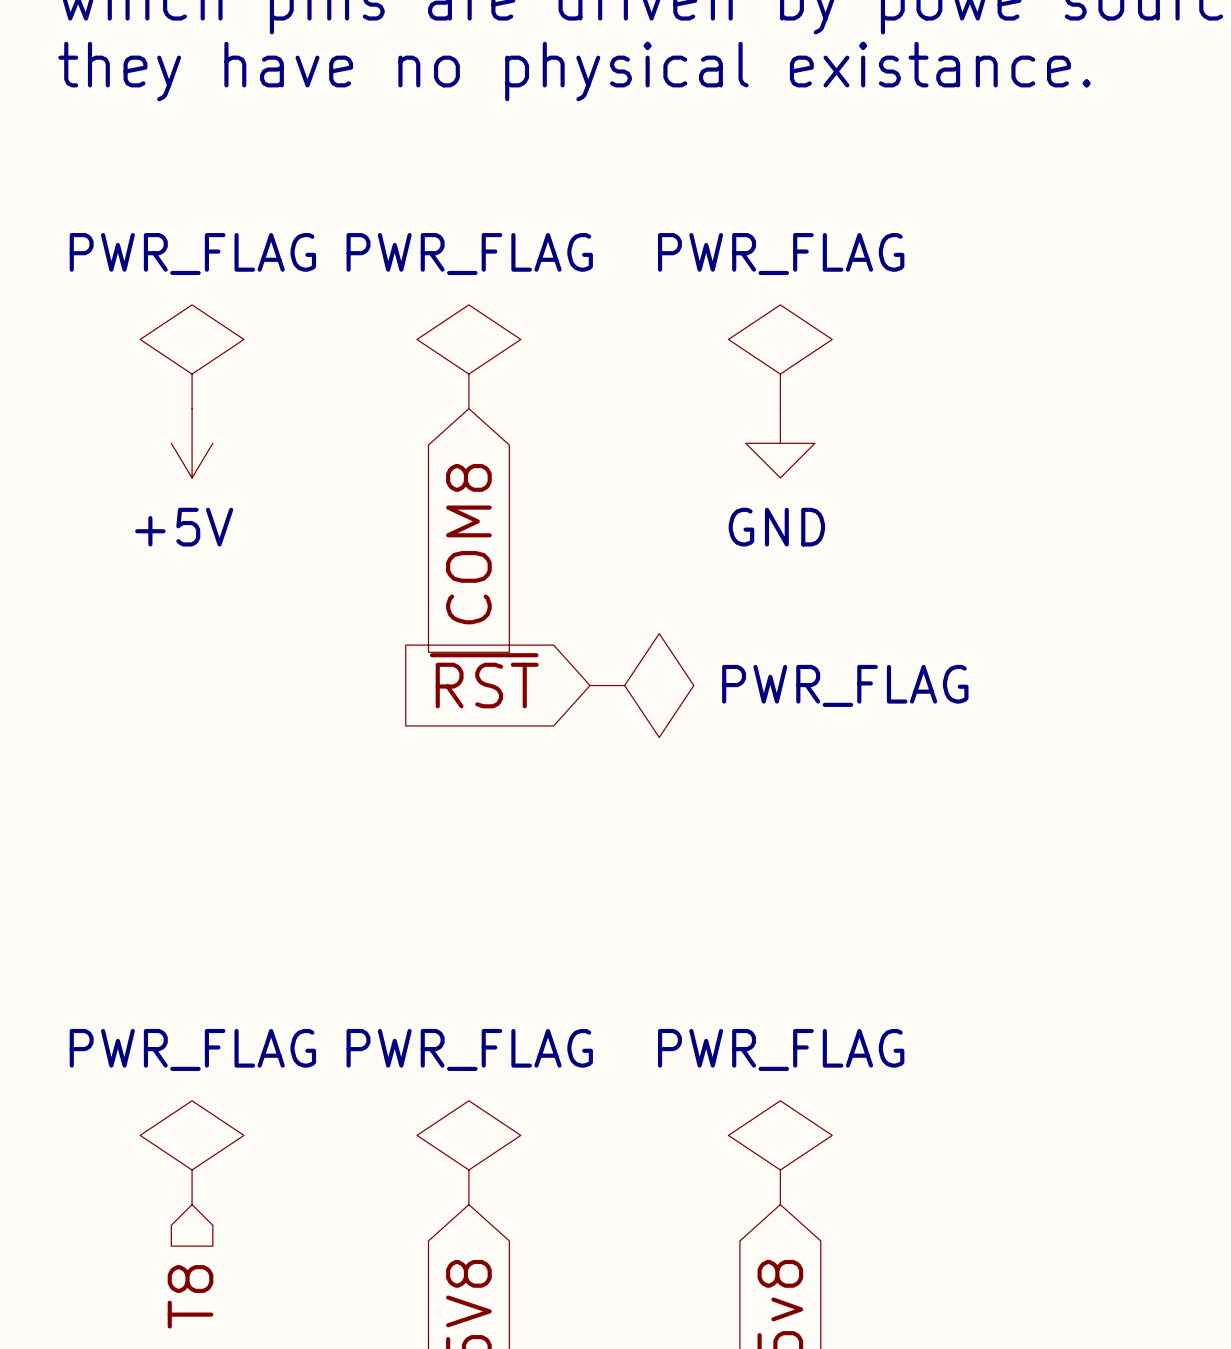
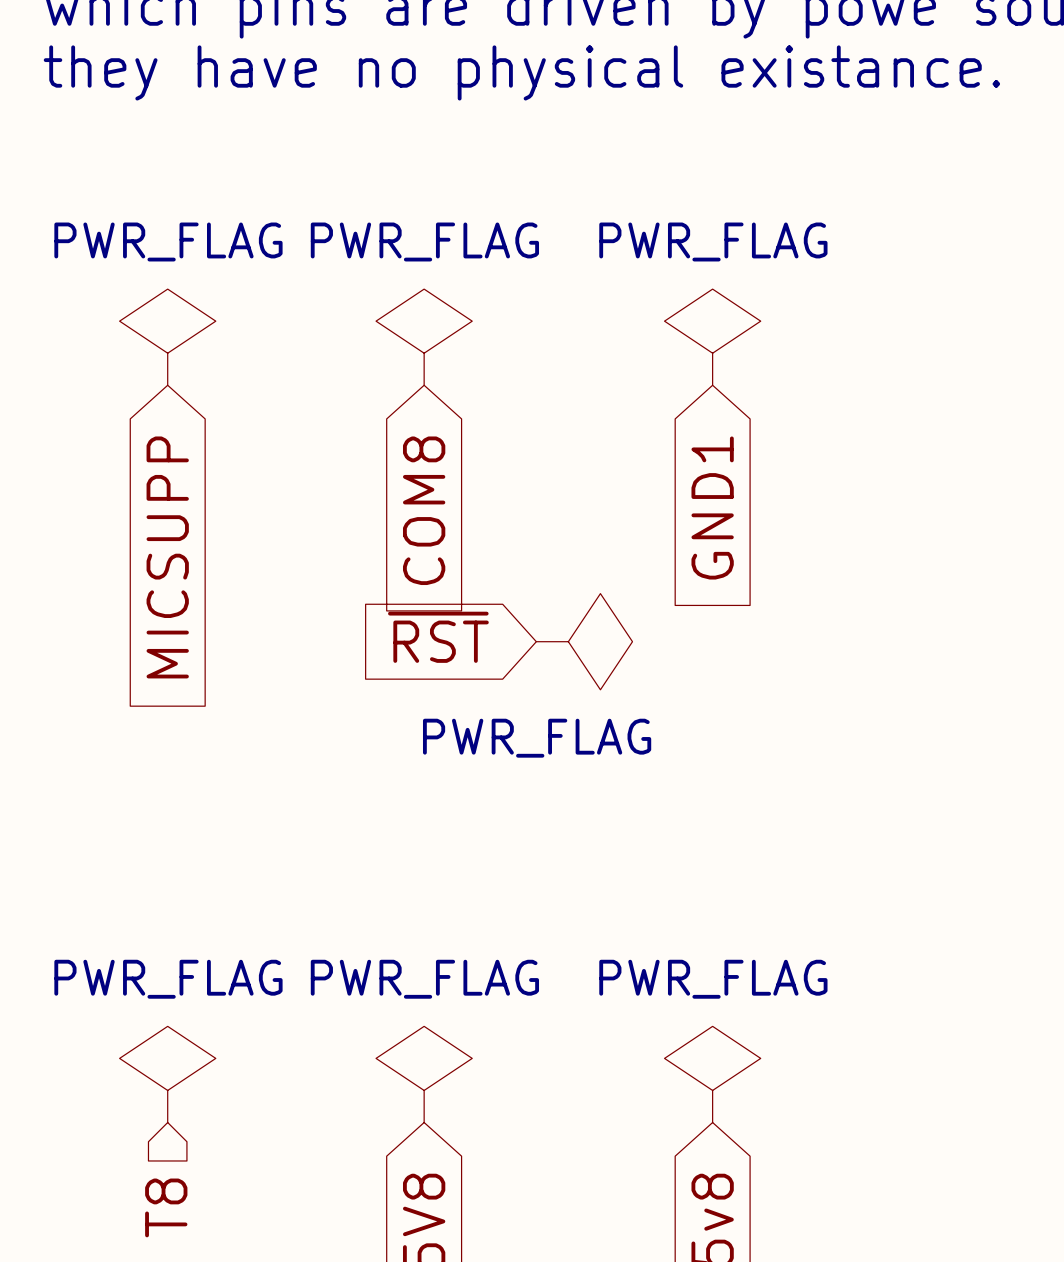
power symbol: +5V (192, 443) -> none
power symbol: GND (780, 443) -> none
global label: none -> GND1 (712, 508)
global label: none -> MICSUPP (167, 557)
power symbol text position: PWR_FLAG (845, 685) -> PWR_FLAG (537, 738)

